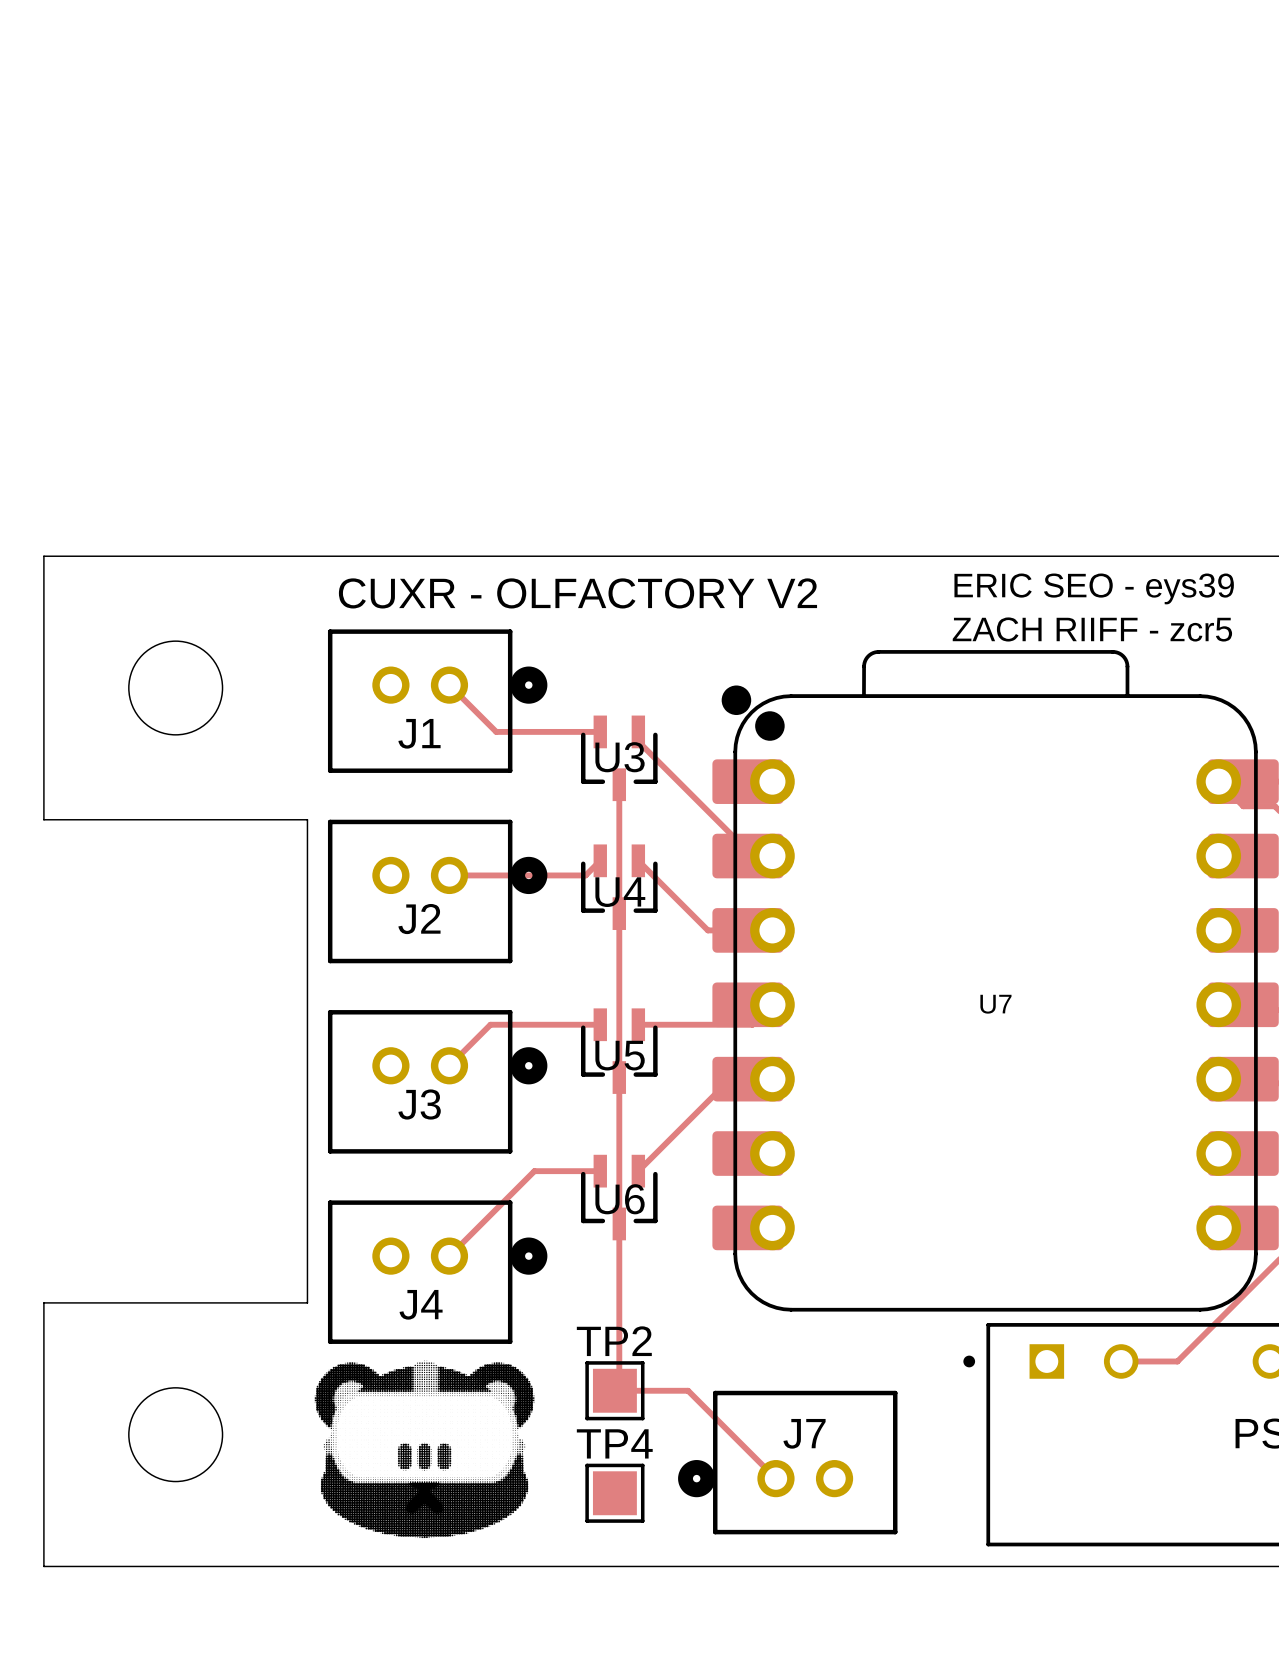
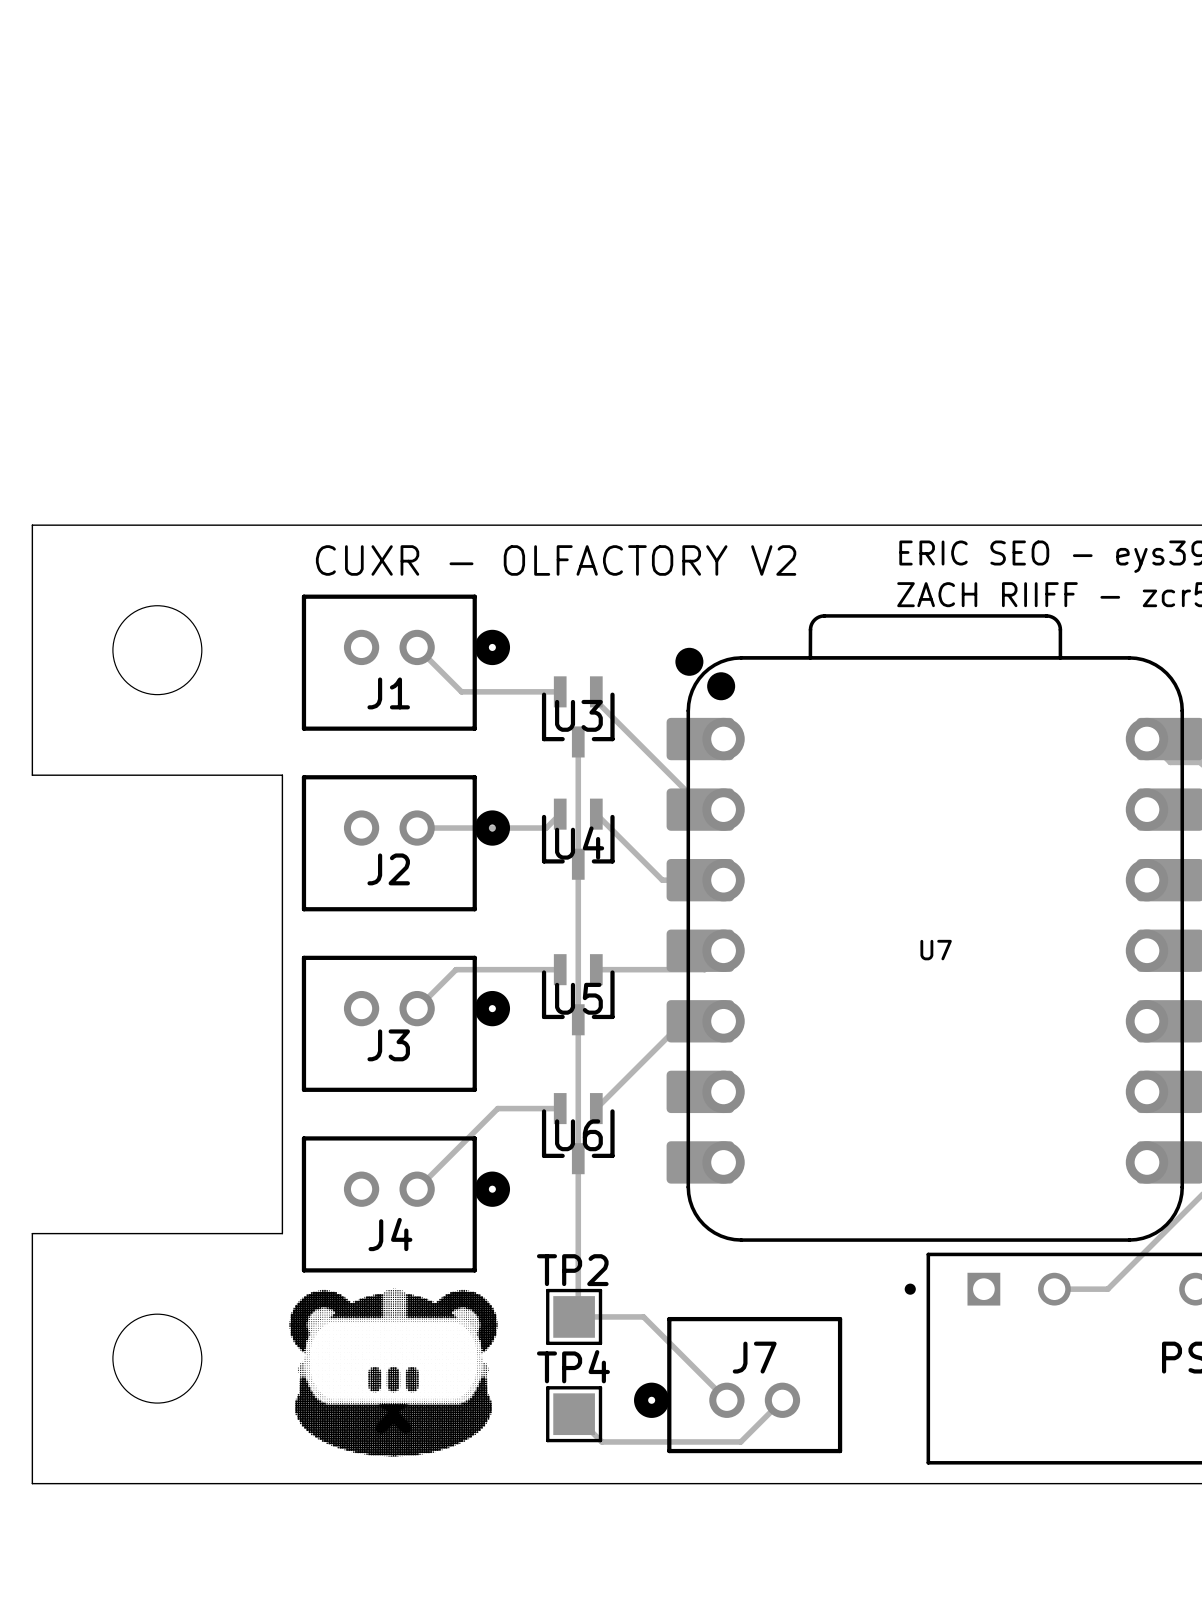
track: none -> (782, 1400) (740, 1441) (601, 1441) (574, 1414)

